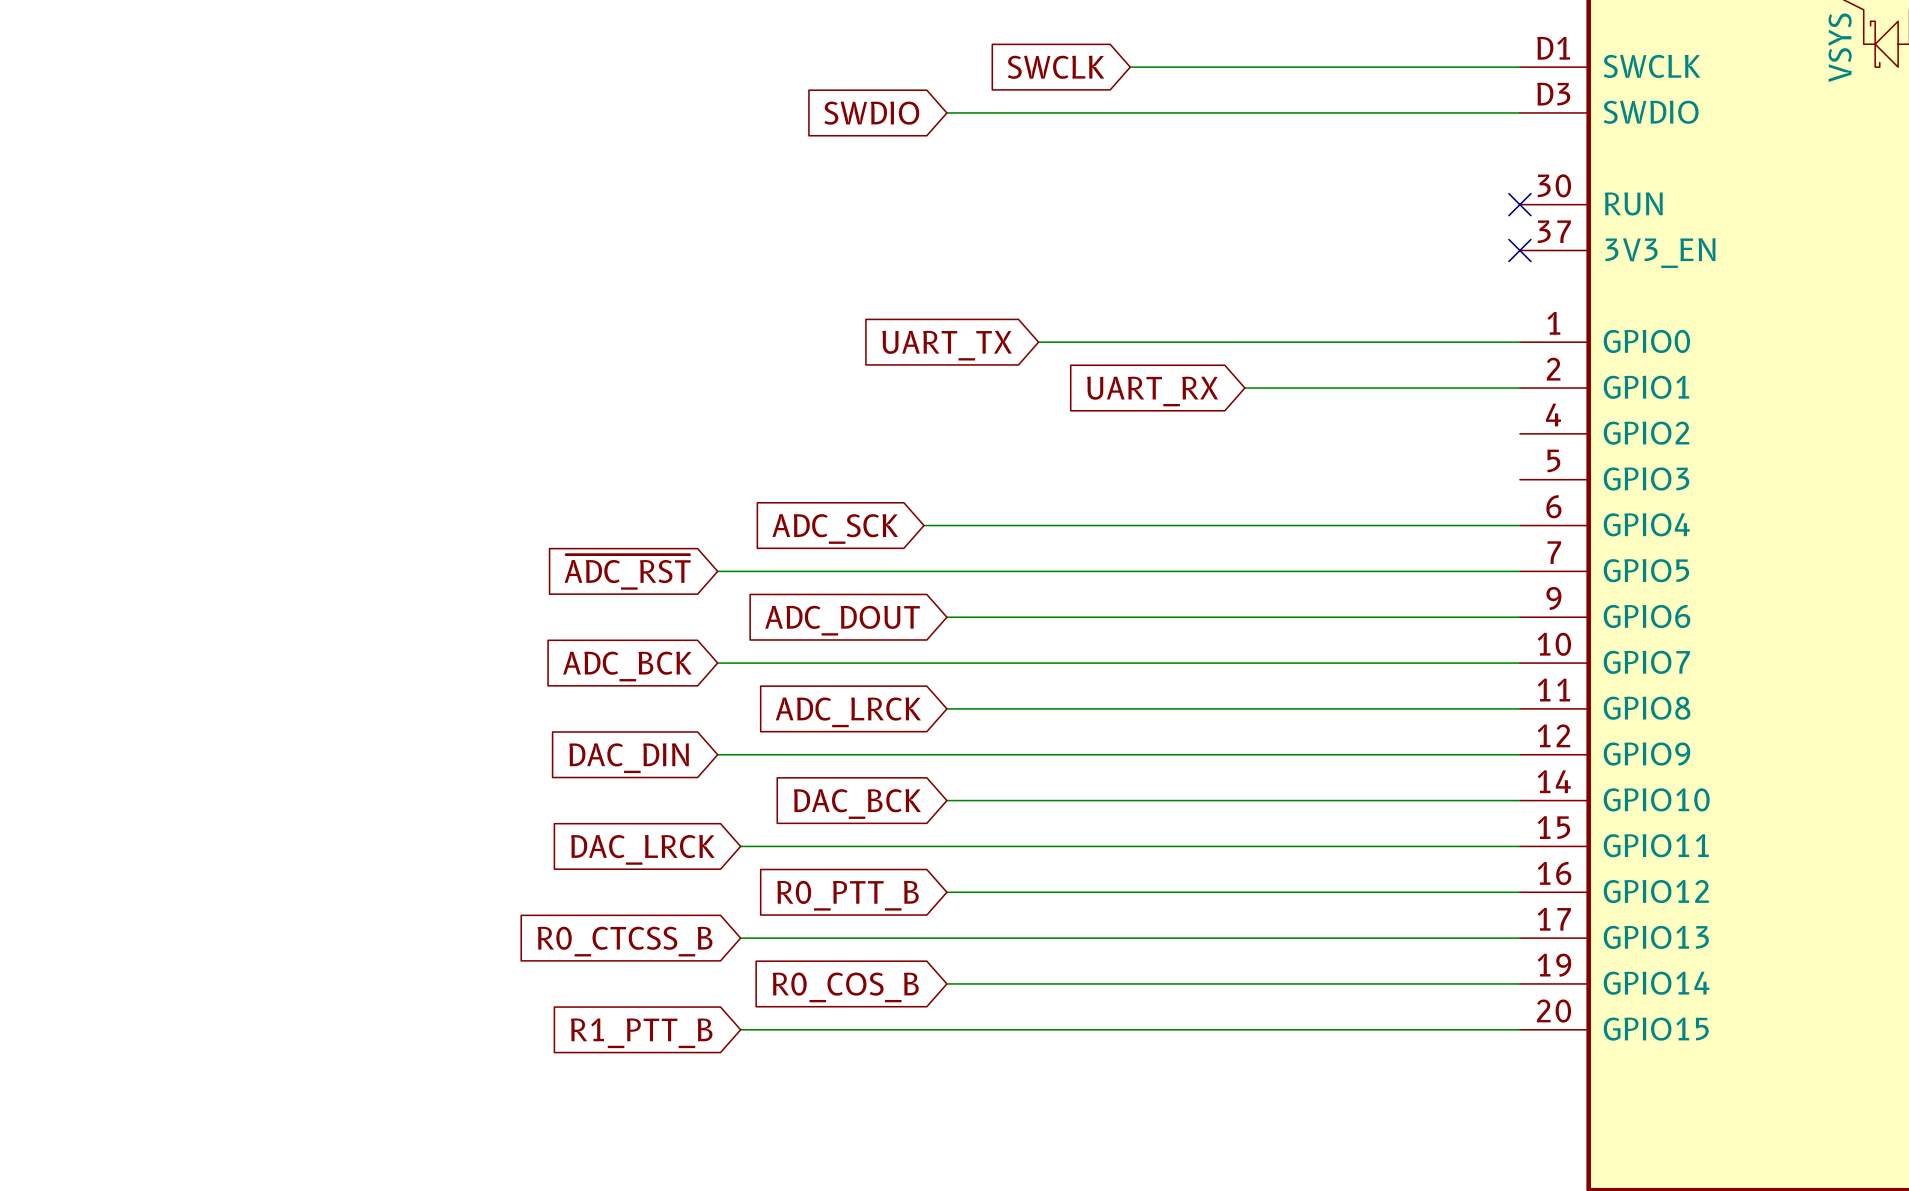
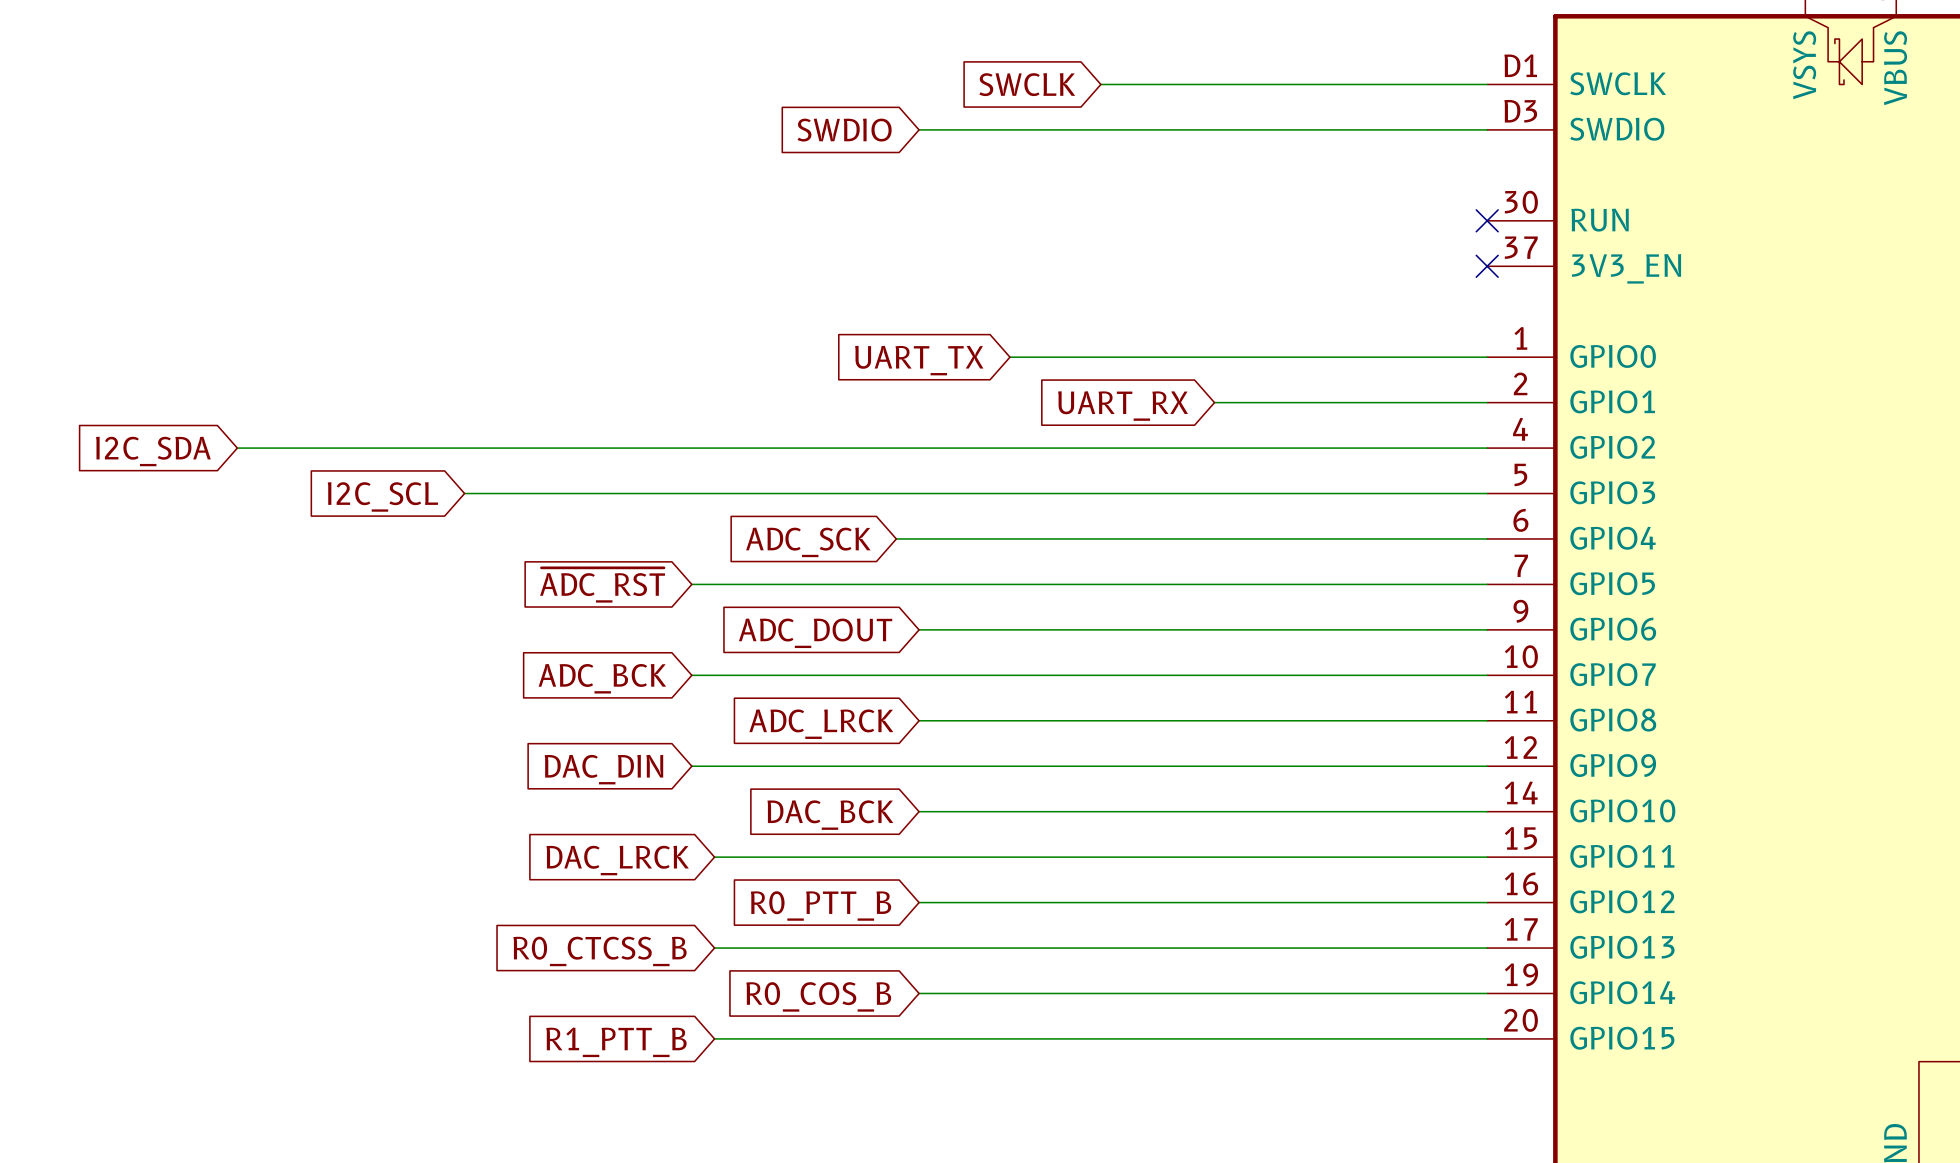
wire: none -> (237, 448) (1487, 448)
global label: none -> I2C_SDA (153, 451)
wire: none -> (464, 493) (1487, 493)
global label: none -> I2C_SCL (382, 496)

